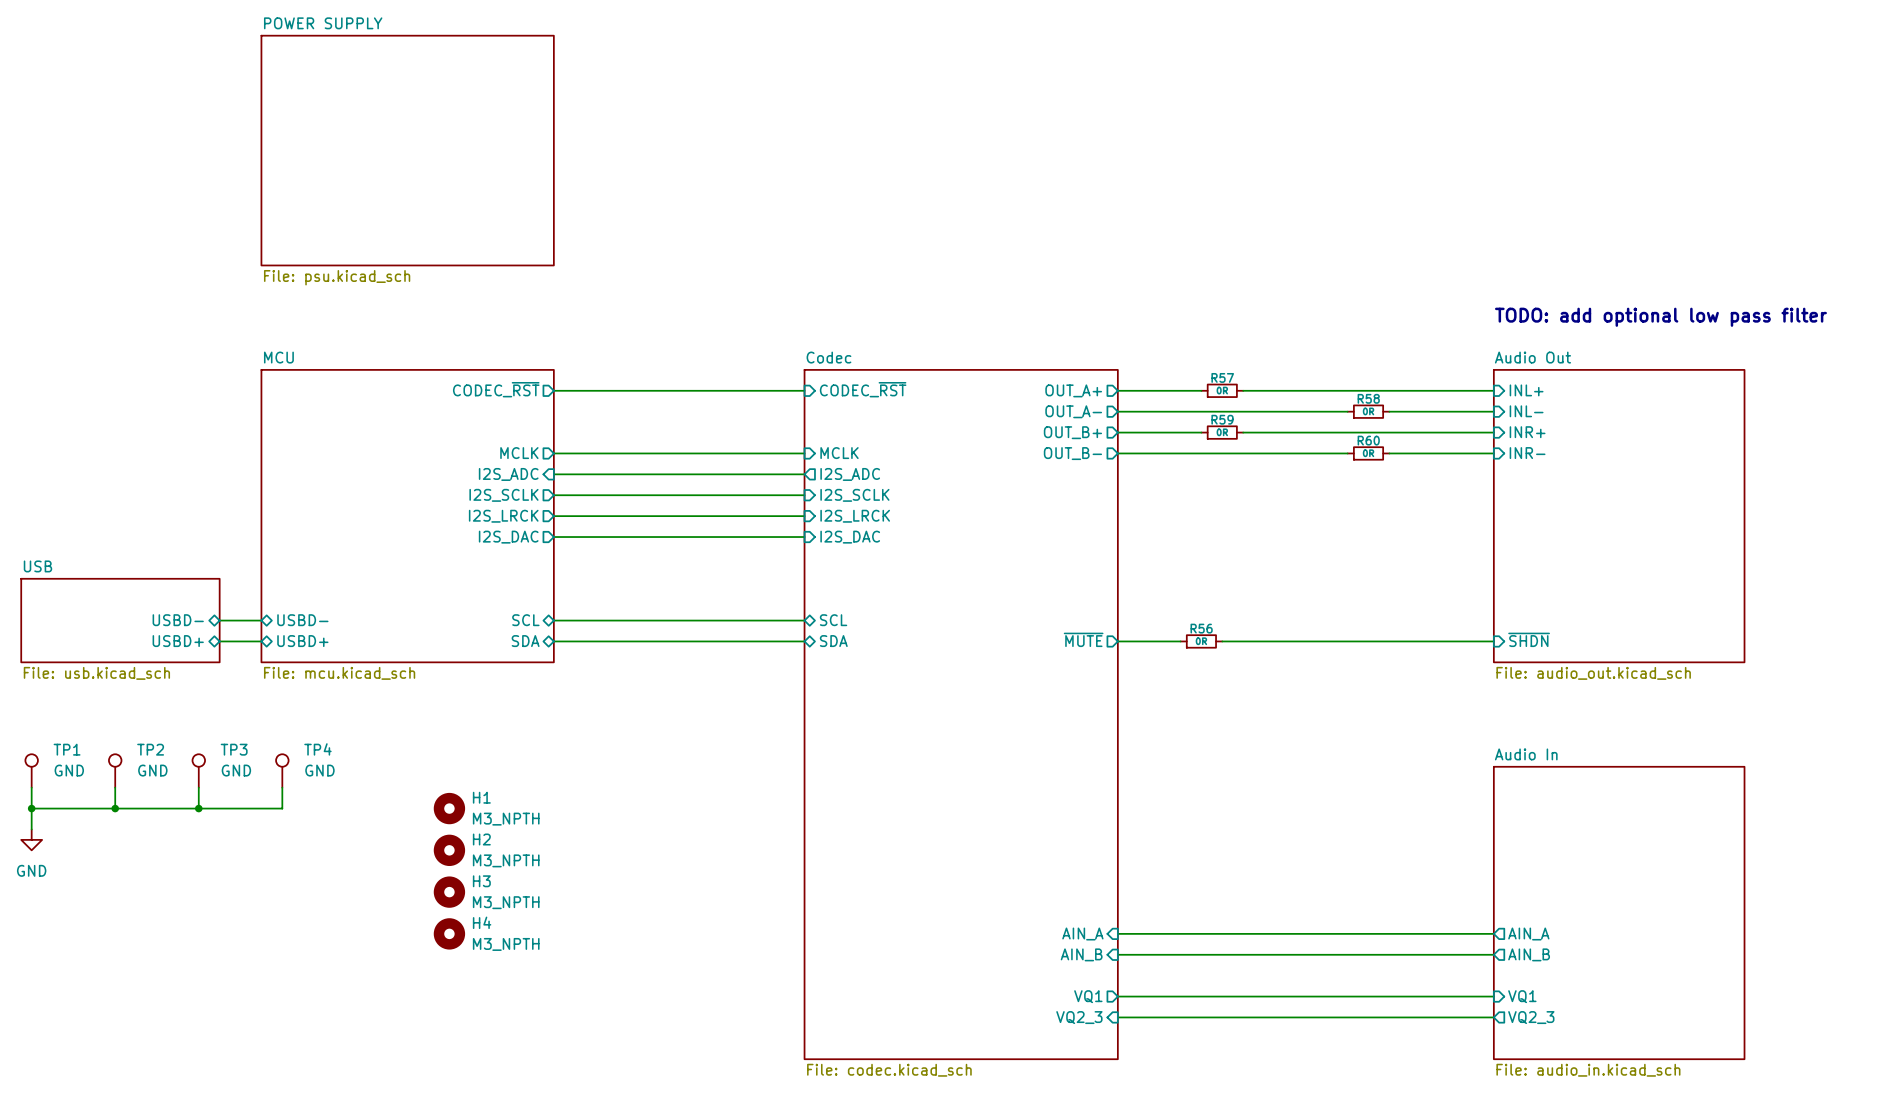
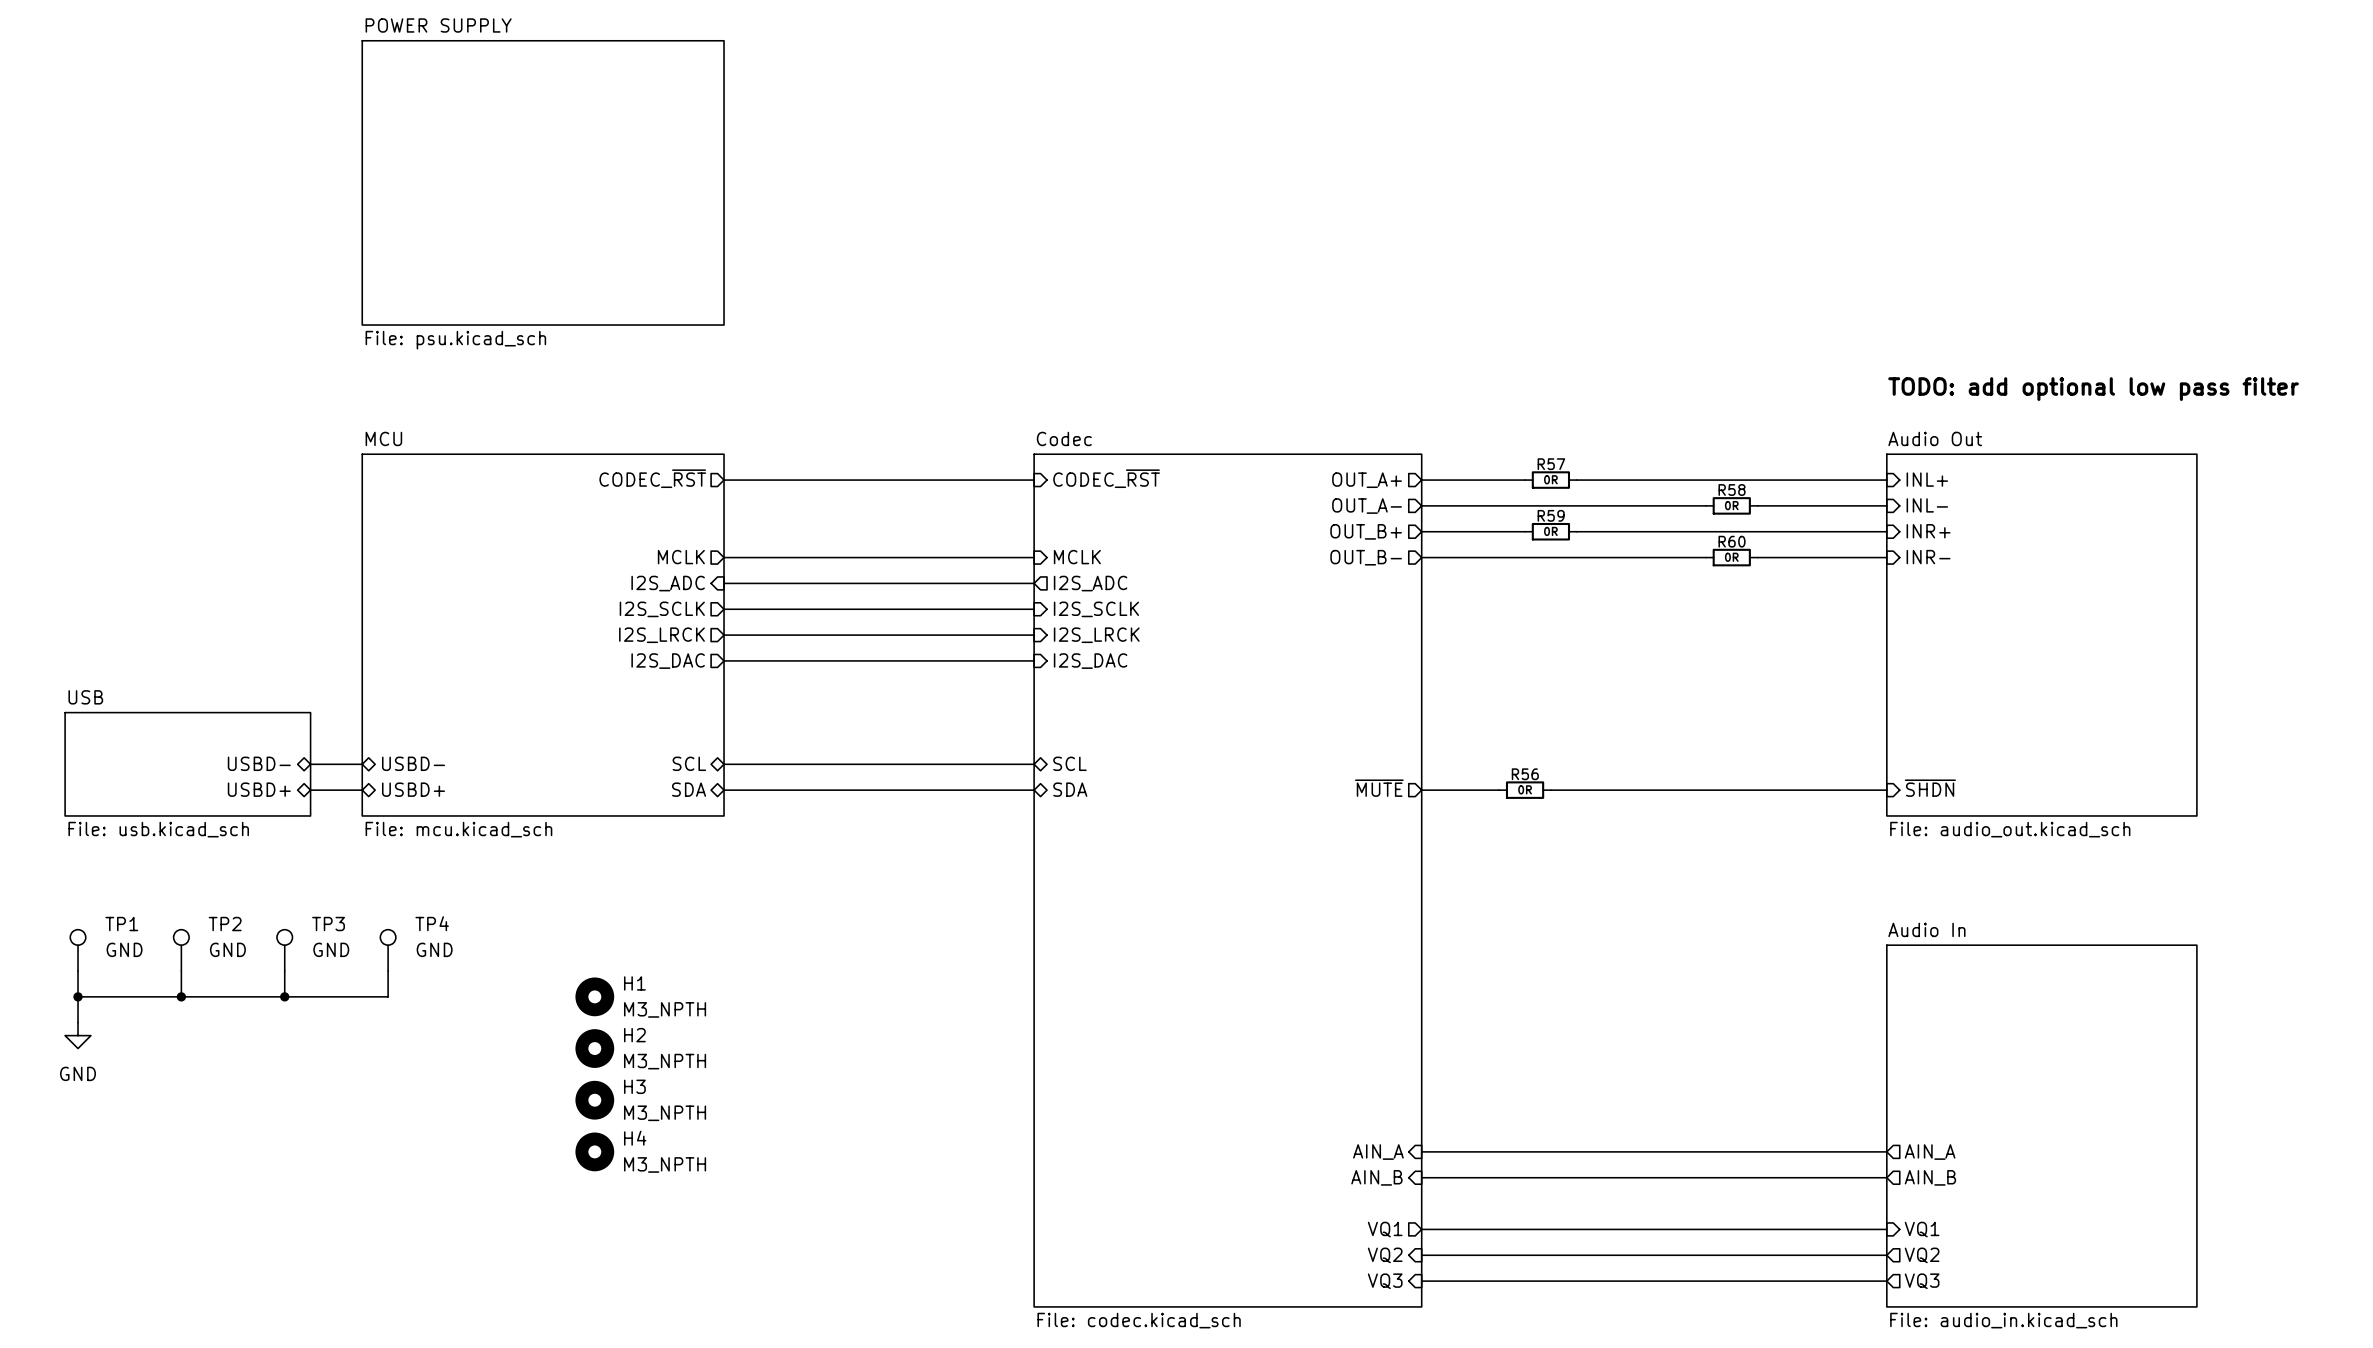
sheet pin: VQ2_3 (1079, 1017) -> VQ2 (1385, 1255)
sheet pin: VQ2_3 (1531, 1017) -> VQ2 (1922, 1255)
sheet pin: none -> VQ3 (1385, 1281)
wire: none -> (1421, 1281) (1886, 1281)
sheet pin: none -> VQ3 (1922, 1281)

